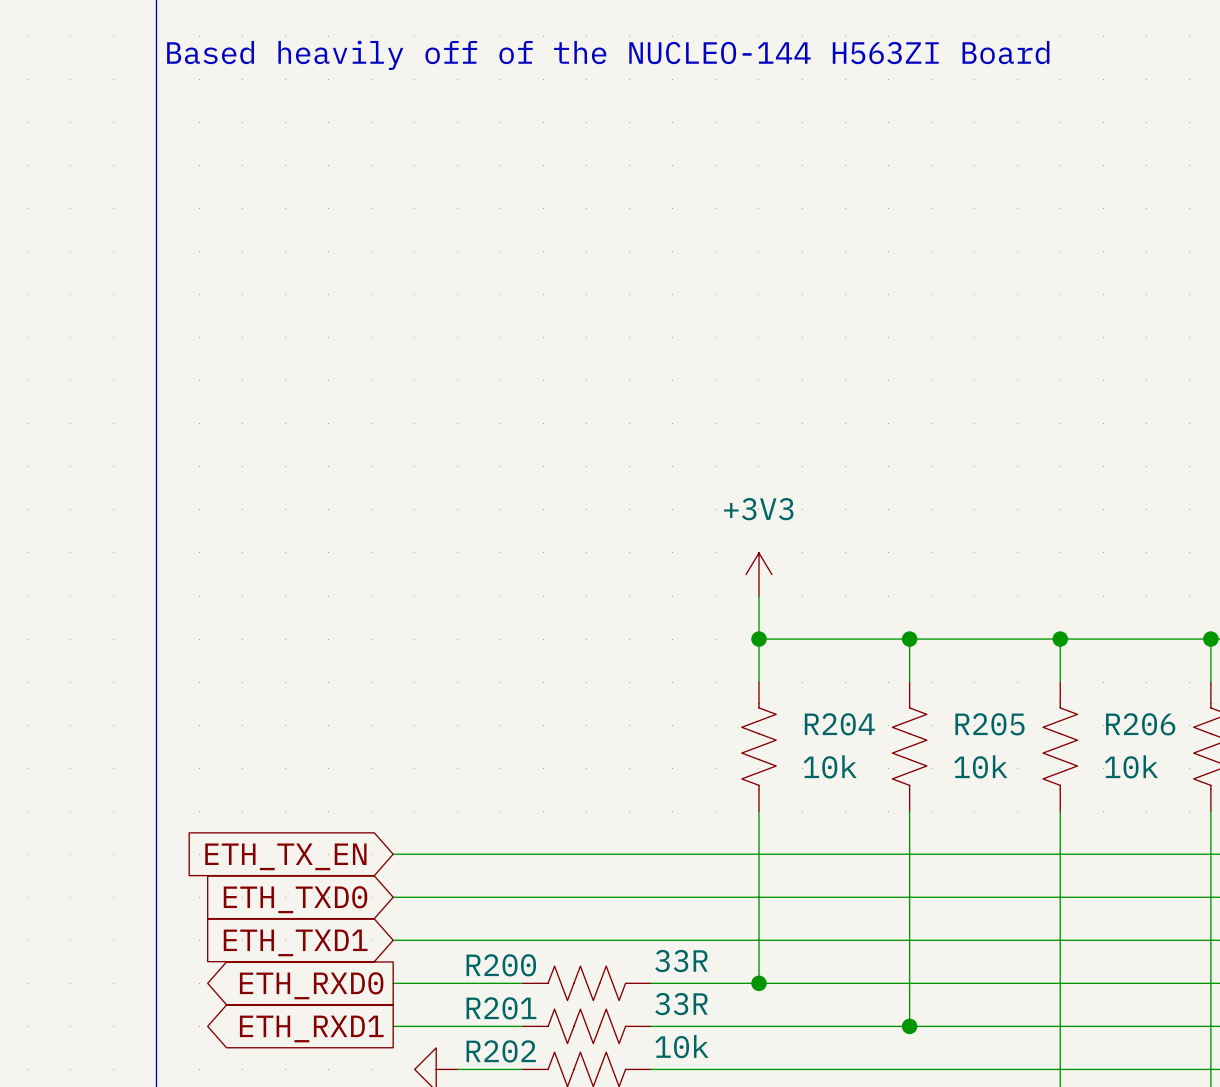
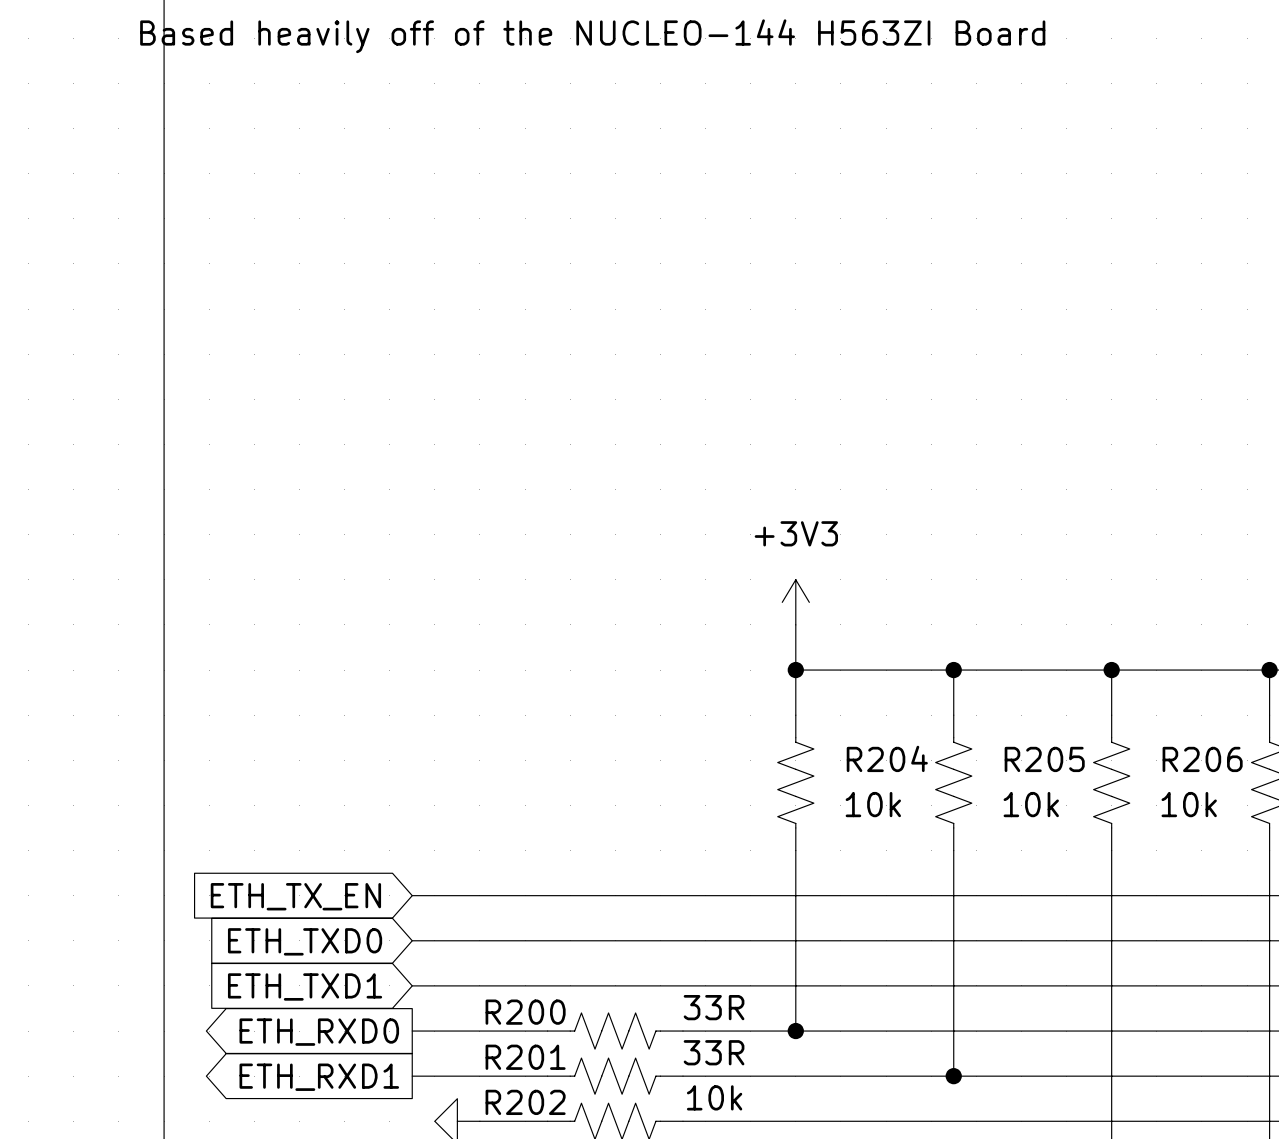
text position: Based heavily off of the NUCLEO-144 H563ZI Board (608, 55) -> Based heavily off of the NUCLEO-144 H563ZI Board (592, 36)

